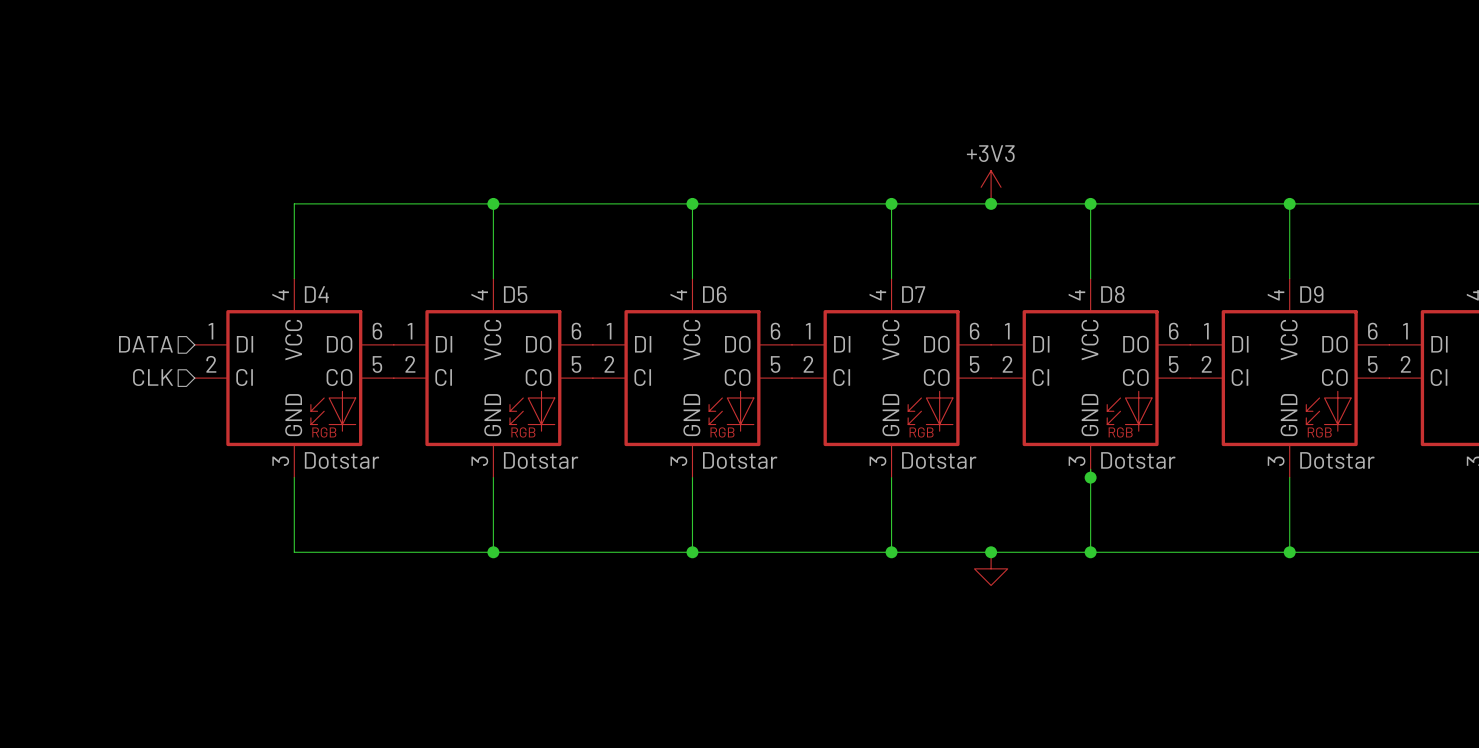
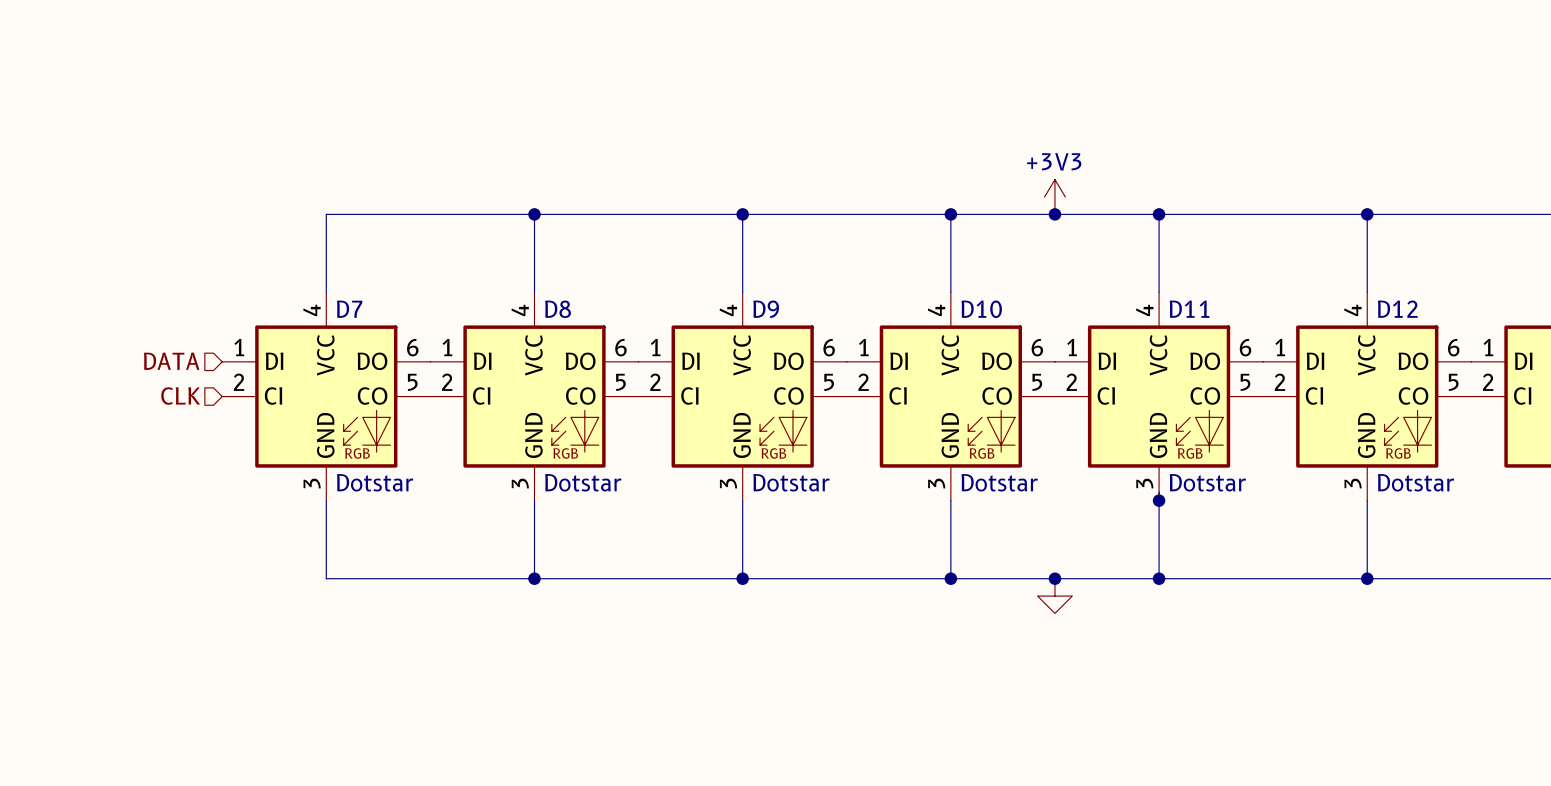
D4 name: D4 (316, 294) -> D7 (349, 309)
D5 name: D5 (515, 294) -> D8 (558, 309)
D6 name: D6 (714, 294) -> D9 (766, 309)
D7 name: D7 (913, 294) -> D10 (981, 309)
D8 name: D8 (1112, 294) -> D11 (1189, 309)
D9 name: D9 (1311, 294) -> D12 (1397, 309)

